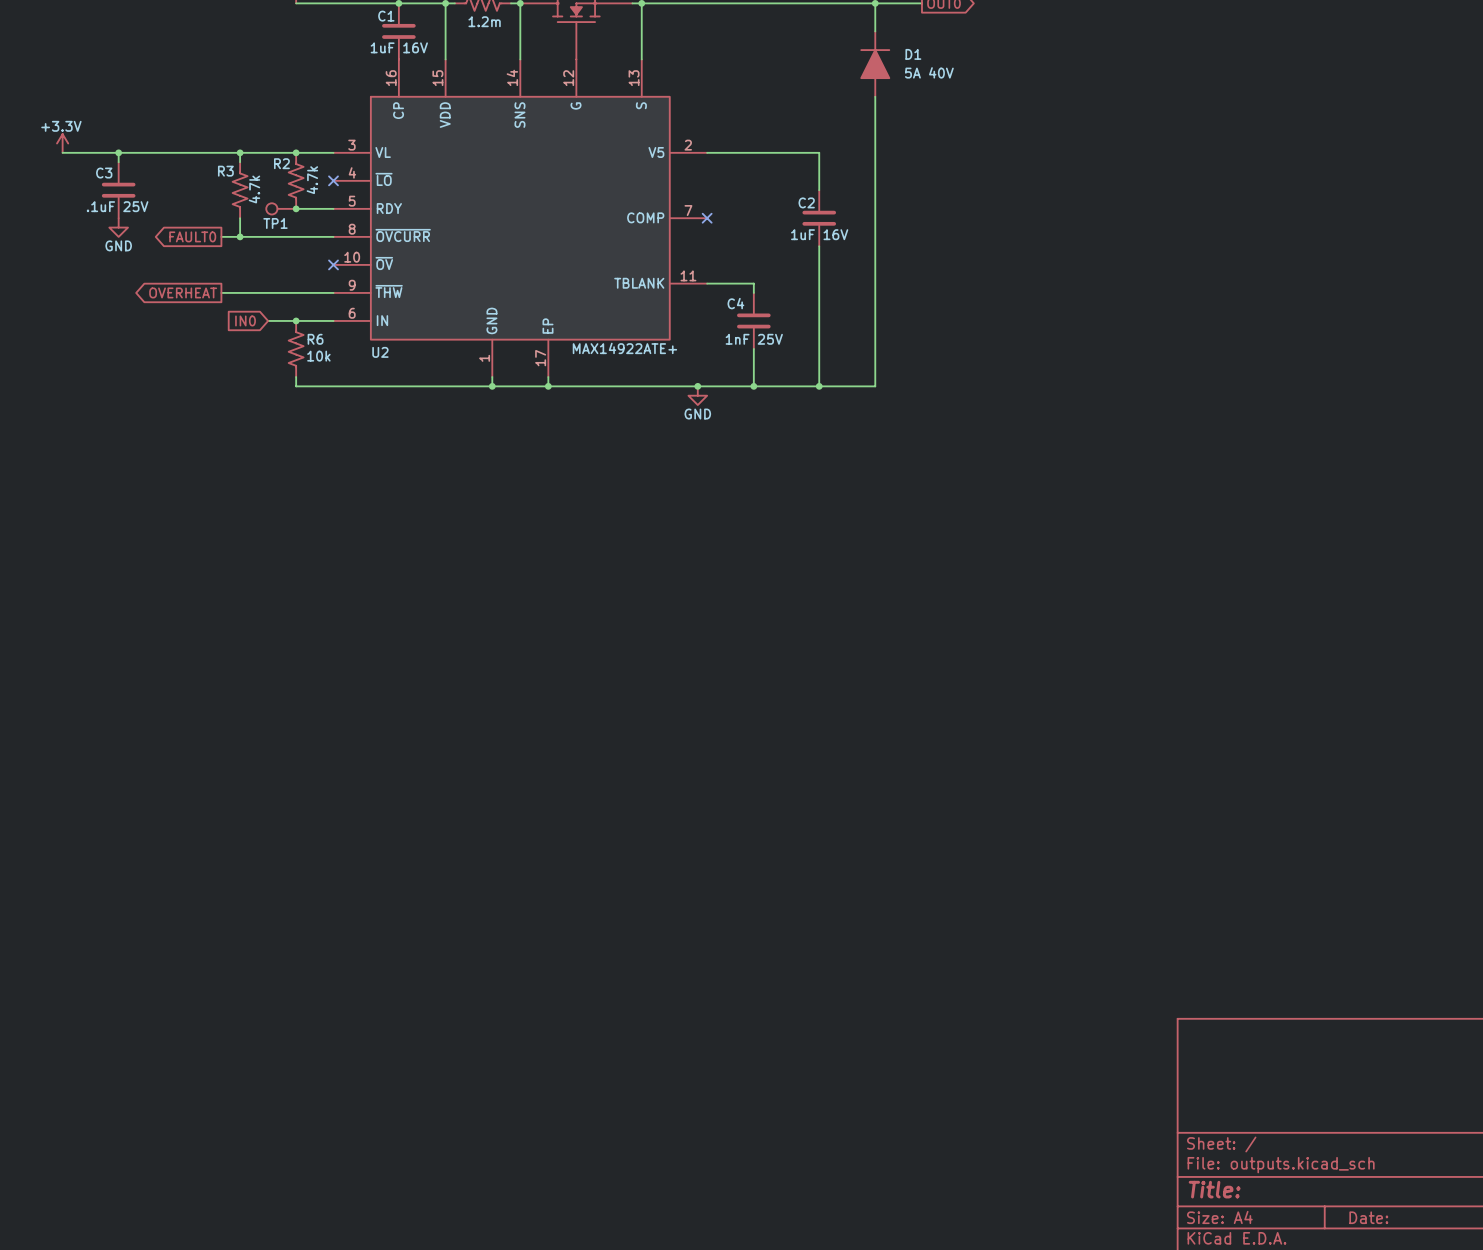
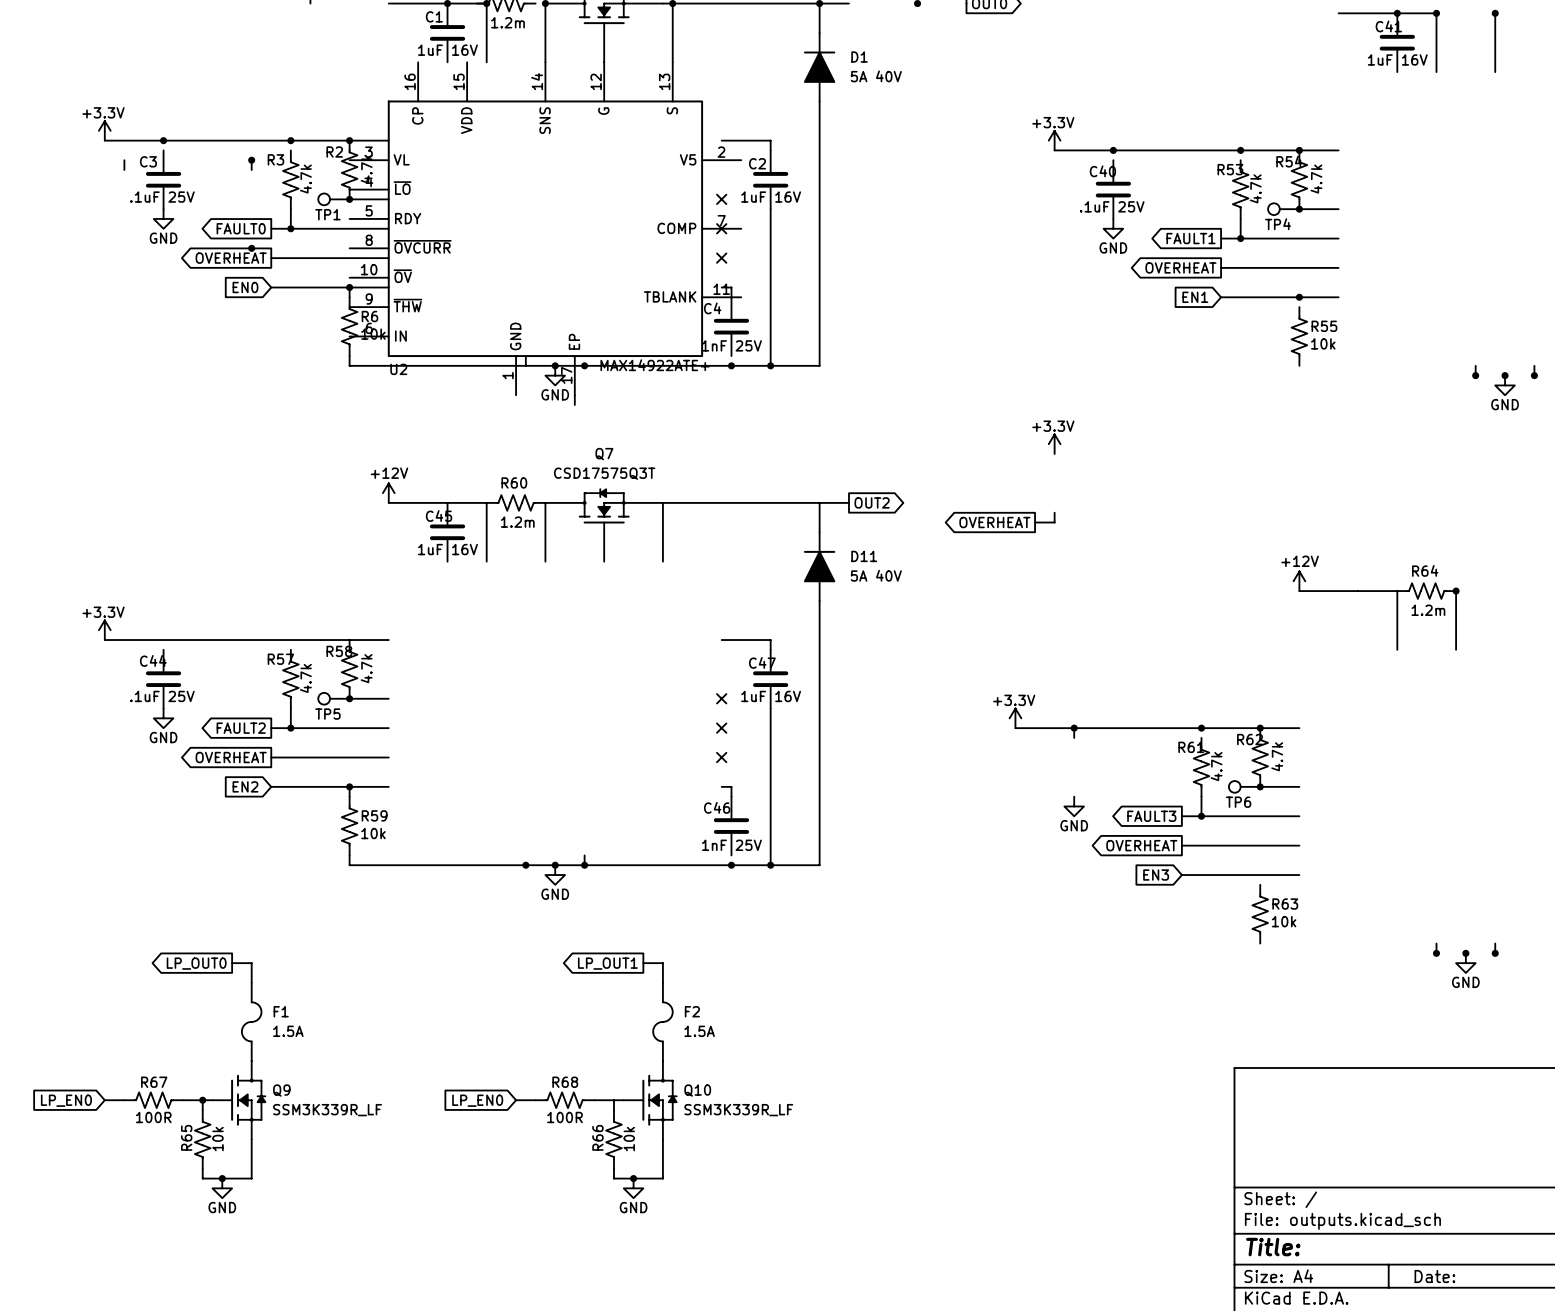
wire: (296, 3) (370, 3) -> none
junction: (398, 3) -> none
junction: none -> (447, 3)
wire: (445, 3) (445, 59) -> none
junction: (445, 3) -> none
wire: none -> (476, 3) (486, 3) (486, 62)
junction: none -> (486, 3)
wire: (510, 3) (520, 3) -> none
junction: none -> (819, 3)
wire: (809, 3) (921, 3) -> none
wire: (875, 3) (875, 31) -> (819, 3) (819, 32)
wire: none -> (1338, 13) (1436, 13) (1436, 72)
junction: none -> (1397, 13)
junction: none -> (1436, 13)
wire: none -> (1495, 13) (1495, 72)
junction: none -> (1495, 13)
C1 position: (398, 31) -> (447, 32)
C41: none -> 1uF 16V (1397, 42)
D1 position: (875, 64) -> (819, 67)
wire: none -> (819, 101) (819, 365) (349, 365) (349, 356)
wire: (875, 96) (875, 386) (296, 386) (296, 377) -> none
junction: none -> (290, 140)
junction: none -> (349, 140)
power symbol: none -> +3.3V (1054, 140)
power symbol position: +3.3V (62, 143) -> +3.3V (104, 130)
wire: none -> (1054, 150) (1338, 150)
junction: none -> (1113, 150)
junction: none -> (1240, 150)
junction: none -> (1299, 150)
wire: (62, 152) (333, 152) -> (104, 140) (388, 140)
junction position: (118, 152) -> (163, 140)
junction: (296, 152) -> none
wire: (707, 152) (819, 152) (819, 190) -> none
R54: none -> 4.7k (1299, 179)
R2 position: (296, 180) -> (349, 170)
no-connect mark: (333, 180) -> none
C40: none -> .1uF 25V (1113, 189)
R53: none -> 4.7k (1240, 189)
C3 position: (118, 190) -> (163, 179)
R3 position: (240, 190) -> (290, 179)
junction: none -> (349, 199)
no-connect mark: none -> (721, 199)
wire: none -> (770, 209) (770, 365)
TP4: none -> (1283, 209)
wire: none -> (1299, 209) (1338, 209)
junction: none -> (1299, 209)
TP1 position: (281, 208) -> (333, 199)
wire: (296, 208) (333, 208) -> (349, 199) (388, 199)
junction: (296, 208) -> none
wire: none -> (1240, 218) (1240, 238)
wire: (240, 218) (240, 236) -> (290, 209) (290, 228)
junction: none -> (290, 228)
no-connect mark: none -> (721, 228)
no-connect mark: (707, 218) -> none
C2 position: (819, 218) -> (770, 179)
power symbol: none -> GND (1113, 228)
power symbol position: GND (118, 227) -> GND (163, 218)
global label: none -> FAULT1 (1190, 238)
wire: none -> (1221, 238) (1338, 238)
junction: none -> (1240, 238)
global label position: FAULT0 (192, 236) -> FAULT0 (241, 228)
wire: (221, 236) (333, 236) -> (271, 228) (388, 228)
wire: none -> (271, 258) (388, 258)
no-connect mark: none -> (721, 258)
wire: (819, 246) (819, 386) -> none
global label: none -> OVERHEAT (1180, 267)
wire: none -> (1221, 267) (1338, 267)
no-connect mark: (333, 264) -> none
global label: none -> EN0 (245, 287)
wire: none -> (349, 287) (349, 297)
junction: none -> (349, 287)
wire: none -> (721, 287) (731, 287) (731, 297)
wire: (707, 283) (753, 283) (753, 292) -> (721, 140) (770, 140) (770, 150)
global label: none -> EN1 (1195, 297)
wire: none -> (1221, 297) (1338, 297)
junction: none -> (1299, 297)
global label position: OVERHEAT (183, 292) -> OVERHEAT (231, 258)
wire: (221, 292) (333, 292) -> (271, 287) (388, 287)
global label: IN0 (245, 320) -> none
wire: (268, 320) (333, 320) -> none
junction: (296, 320) -> none
C4 position: (753, 320) -> (731, 326)
R55: none -> 10k (1299, 336)
R6 position: (296, 348) -> (349, 326)
junction: none -> (555, 365)
junction: none -> (584, 365)
junction: none -> (731, 365)
junction: none -> (770, 365)
wire: (753, 348) (753, 386) -> none
wire: none -> (1475, 365) (1475, 375)
wire: none -> (1534, 365) (1534, 375)
junction: none -> (1475, 375)
junction: none -> (1505, 375)
junction: none -> (1534, 375)
power symbol: none -> GND (1505, 385)
wire: (492, 377) (492, 386) -> (525, 356) (525, 365)
junction: (492, 386) -> none
junction: (548, 386) -> none
junction: (697, 386) -> none
junction: (753, 386) -> none
junction: (819, 386) -> none
power symbol position: GND (697, 395) -> GND (555, 375)
power symbol: none -> +3.3V (1054, 444)
power symbol: none -> +12V (388, 493)
wire: none -> (388, 502) (486, 502) (486, 561)
R60: none -> 1.2m (516, 502)
wire: none -> (545, 502) (545, 561)
wire: none -> (819, 502) (819, 532)
wire: none -> (848, 502) (662, 502) (662, 561)
global label: none -> OUT2 (872, 502)
wire: none -> (1054, 512) (1054, 522) (1035, 522)
global label: none -> OVERHEAT (994, 522)
Q7: none -> CSD17575Q3T (604, 525)
C45: none -> 1uF 16V (447, 532)
D11: none -> 5A 40V (819, 566)
power symbol: none -> +12V (1299, 581)
wire: none -> (1299, 591) (1397, 591) (1397, 649)
R64: none -> 1.2m (1426, 591)
wire: none -> (1456, 591) (1456, 649)
junction: none -> (1456, 591)
wire: none -> (819, 600) (819, 865) (349, 865) (349, 855)
power symbol: none -> +3.3V (104, 630)
wire: none -> (104, 640) (388, 640)
wire: none -> (721, 640) (770, 640) (770, 649)
R58: none -> 4.7k (349, 669)
C44: none -> .1uF 25V (163, 679)
R57: none -> 4.7k (290, 679)
C47: none -> 1uF 16V (770, 679)
TP5: none -> (333, 698)
wire: none -> (349, 698) (388, 698)
junction: none -> (349, 698)
no-connect mark: none -> (721, 698)
wire: none -> (290, 708) (290, 728)
wire: none -> (770, 708) (770, 865)
power symbol: none -> GND (163, 718)
power symbol: none -> +3.3V (1015, 718)
global label: none -> FAULT2 (241, 728)
wire: none -> (271, 728) (388, 728)
junction: none -> (290, 728)
no-connect mark: none -> (721, 728)
wire: none -> (1015, 728) (1299, 728)
wire: none -> (1074, 728) (1074, 737)
junction: none -> (1074, 728)
junction: none -> (1201, 728)
junction: none -> (1260, 728)
global label: none -> OVERHEAT (231, 757)
wire: none -> (271, 757) (388, 757)
no-connect mark: none -> (721, 757)
R62: none -> 4.7k (1260, 757)
R61: none -> 4.7k (1201, 767)
global label: none -> EN2 (245, 786)
wire: none -> (271, 786) (388, 786)
wire: none -> (349, 786) (349, 796)
junction: none -> (349, 786)
wire: none -> (721, 786) (731, 786) (731, 796)
TP6: none -> (1244, 786)
wire: none -> (1260, 786) (1299, 786)
junction: none -> (1260, 786)
wire: none -> (1201, 796) (1201, 816)
power symbol: none -> GND (1074, 806)
global label: none -> FAULT3 (1151, 816)
wire: none -> (1181, 816) (1299, 816)
junction: none -> (1201, 816)
R59: none -> 10k (349, 826)
C46: none -> 1nF 25V (731, 826)
global label: none -> OVERHEAT (1141, 845)
wire: none -> (1181, 845) (1299, 845)
wire: none -> (584, 855) (584, 865)
junction: none -> (525, 865)
junction: none -> (555, 865)
junction: none -> (584, 865)
junction: none -> (731, 865)
junction: none -> (770, 865)
power symbol: none -> GND (555, 875)
global label: none -> EN3 (1156, 875)
wire: none -> (1181, 875) (1299, 875)
R63: none -> 10k (1260, 914)
wire: none -> (1436, 943) (1436, 953)
wire: none -> (1495, 943) (1495, 953)
junction: none -> (1436, 953)
junction: none -> (1465, 953)
junction: none -> (1495, 953)
wire: none -> (232, 963) (251, 963) (251, 982)
wire: none -> (643, 963) (662, 963) (662, 982)
power symbol: none -> GND (1465, 963)
global label: none -> LP_OUT0 (196, 963)
global label: none -> LP_OUT1 (607, 963)
F1: none -> 1.5A (251, 1021)
F2: none -> 1.5A (662, 1021)
wire: none -> (104, 1100) (124, 1100)
R67: none -> 100R (153, 1100)
wire: none -> (183, 1100) (212, 1100)
wire: none -> (202, 1100) (202, 1110)
junction: none -> (202, 1100)
Q9: none -> SSM3K339R_LF (239, 1100)
wire: none -> (516, 1100) (535, 1100)
R68: none -> 100R (565, 1100)
wire: none -> (594, 1100) (623, 1100)
wire: none -> (613, 1100) (613, 1110)
Q10: none -> SSM3K339R_LF (650, 1100)
global label: none -> LP_EN0 (66, 1100)
global label: none -> LP_EN0 (477, 1100)
R65: none -> 10k (202, 1139)
wire: none -> (251, 1139) (251, 1178) (202, 1178) (202, 1168)
R66: none -> 10k (613, 1139)
wire: none -> (662, 1139) (662, 1178) (613, 1178) (613, 1168)
junction: none -> (222, 1178)
junction: none -> (633, 1178)
power symbol: none -> GND (222, 1188)
power symbol: none -> GND (633, 1188)

